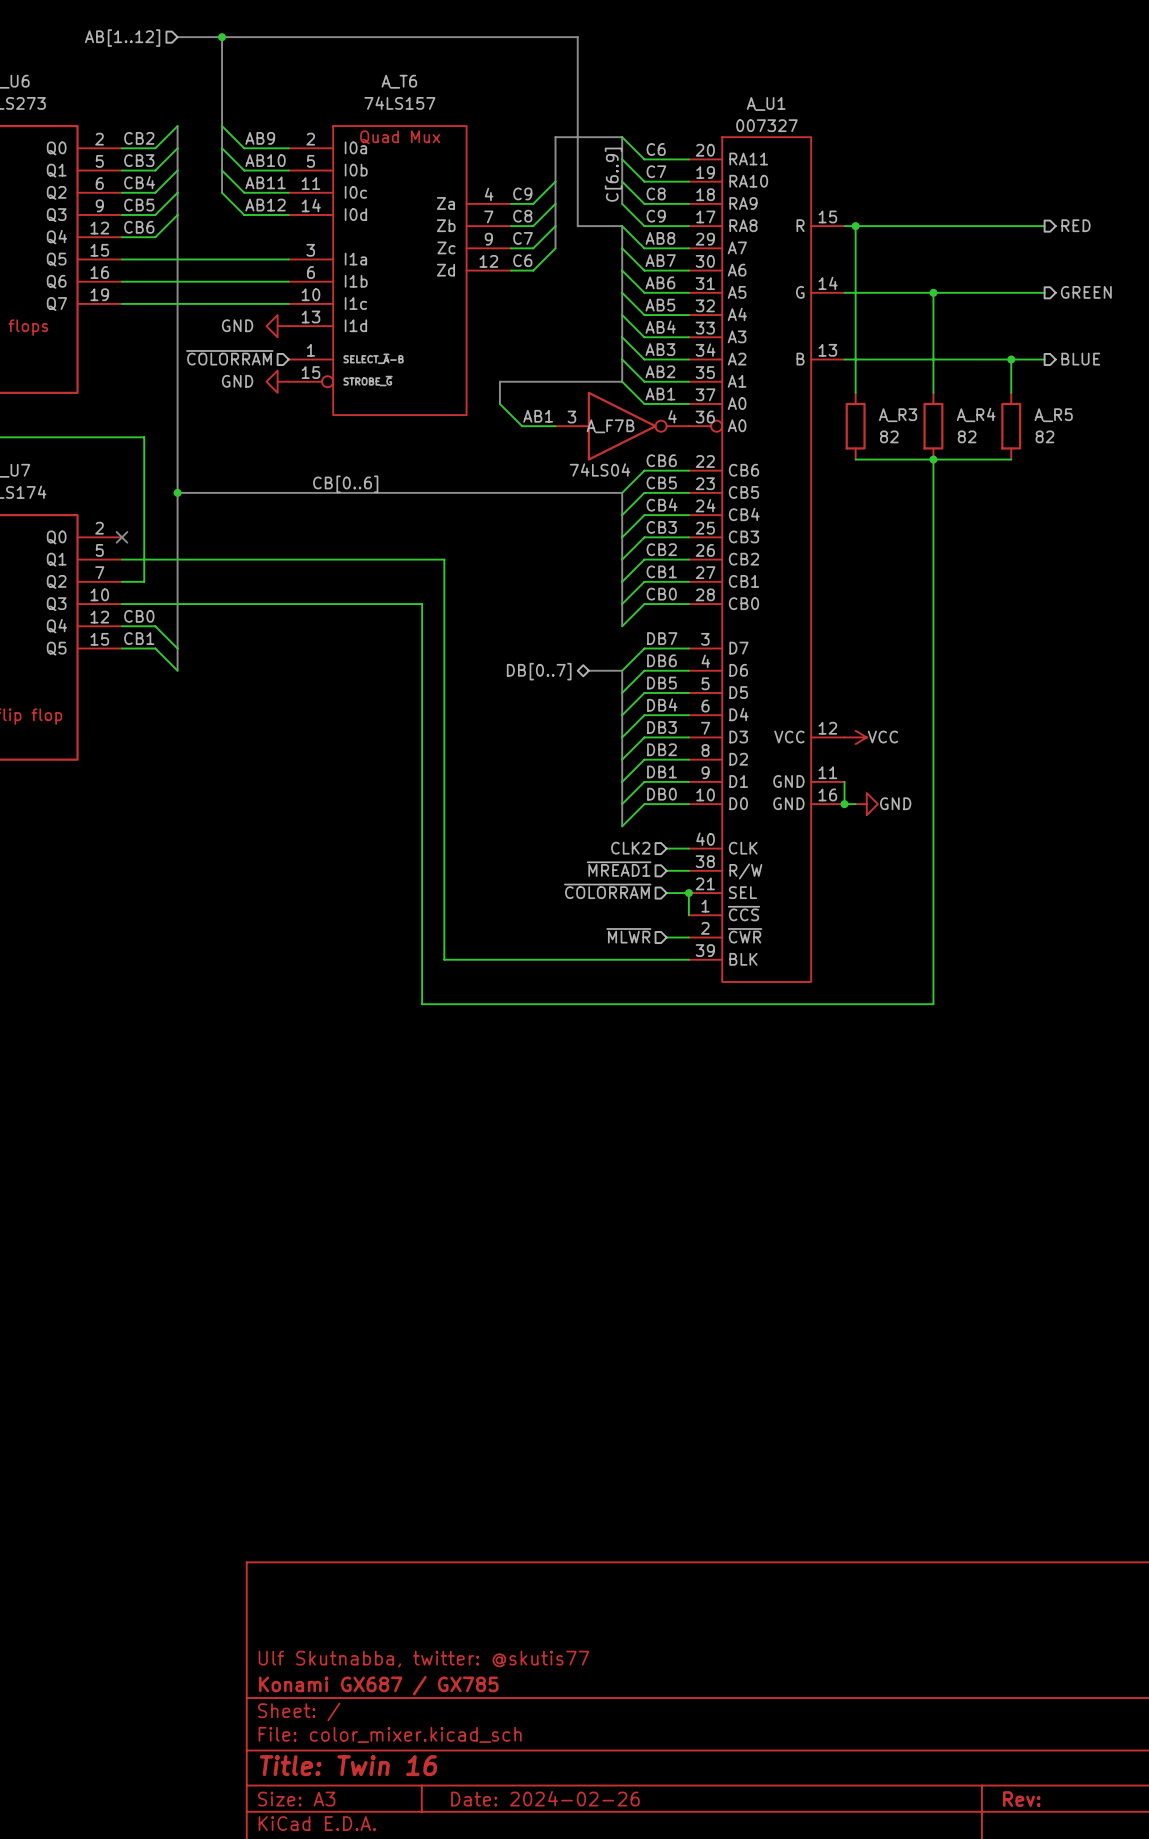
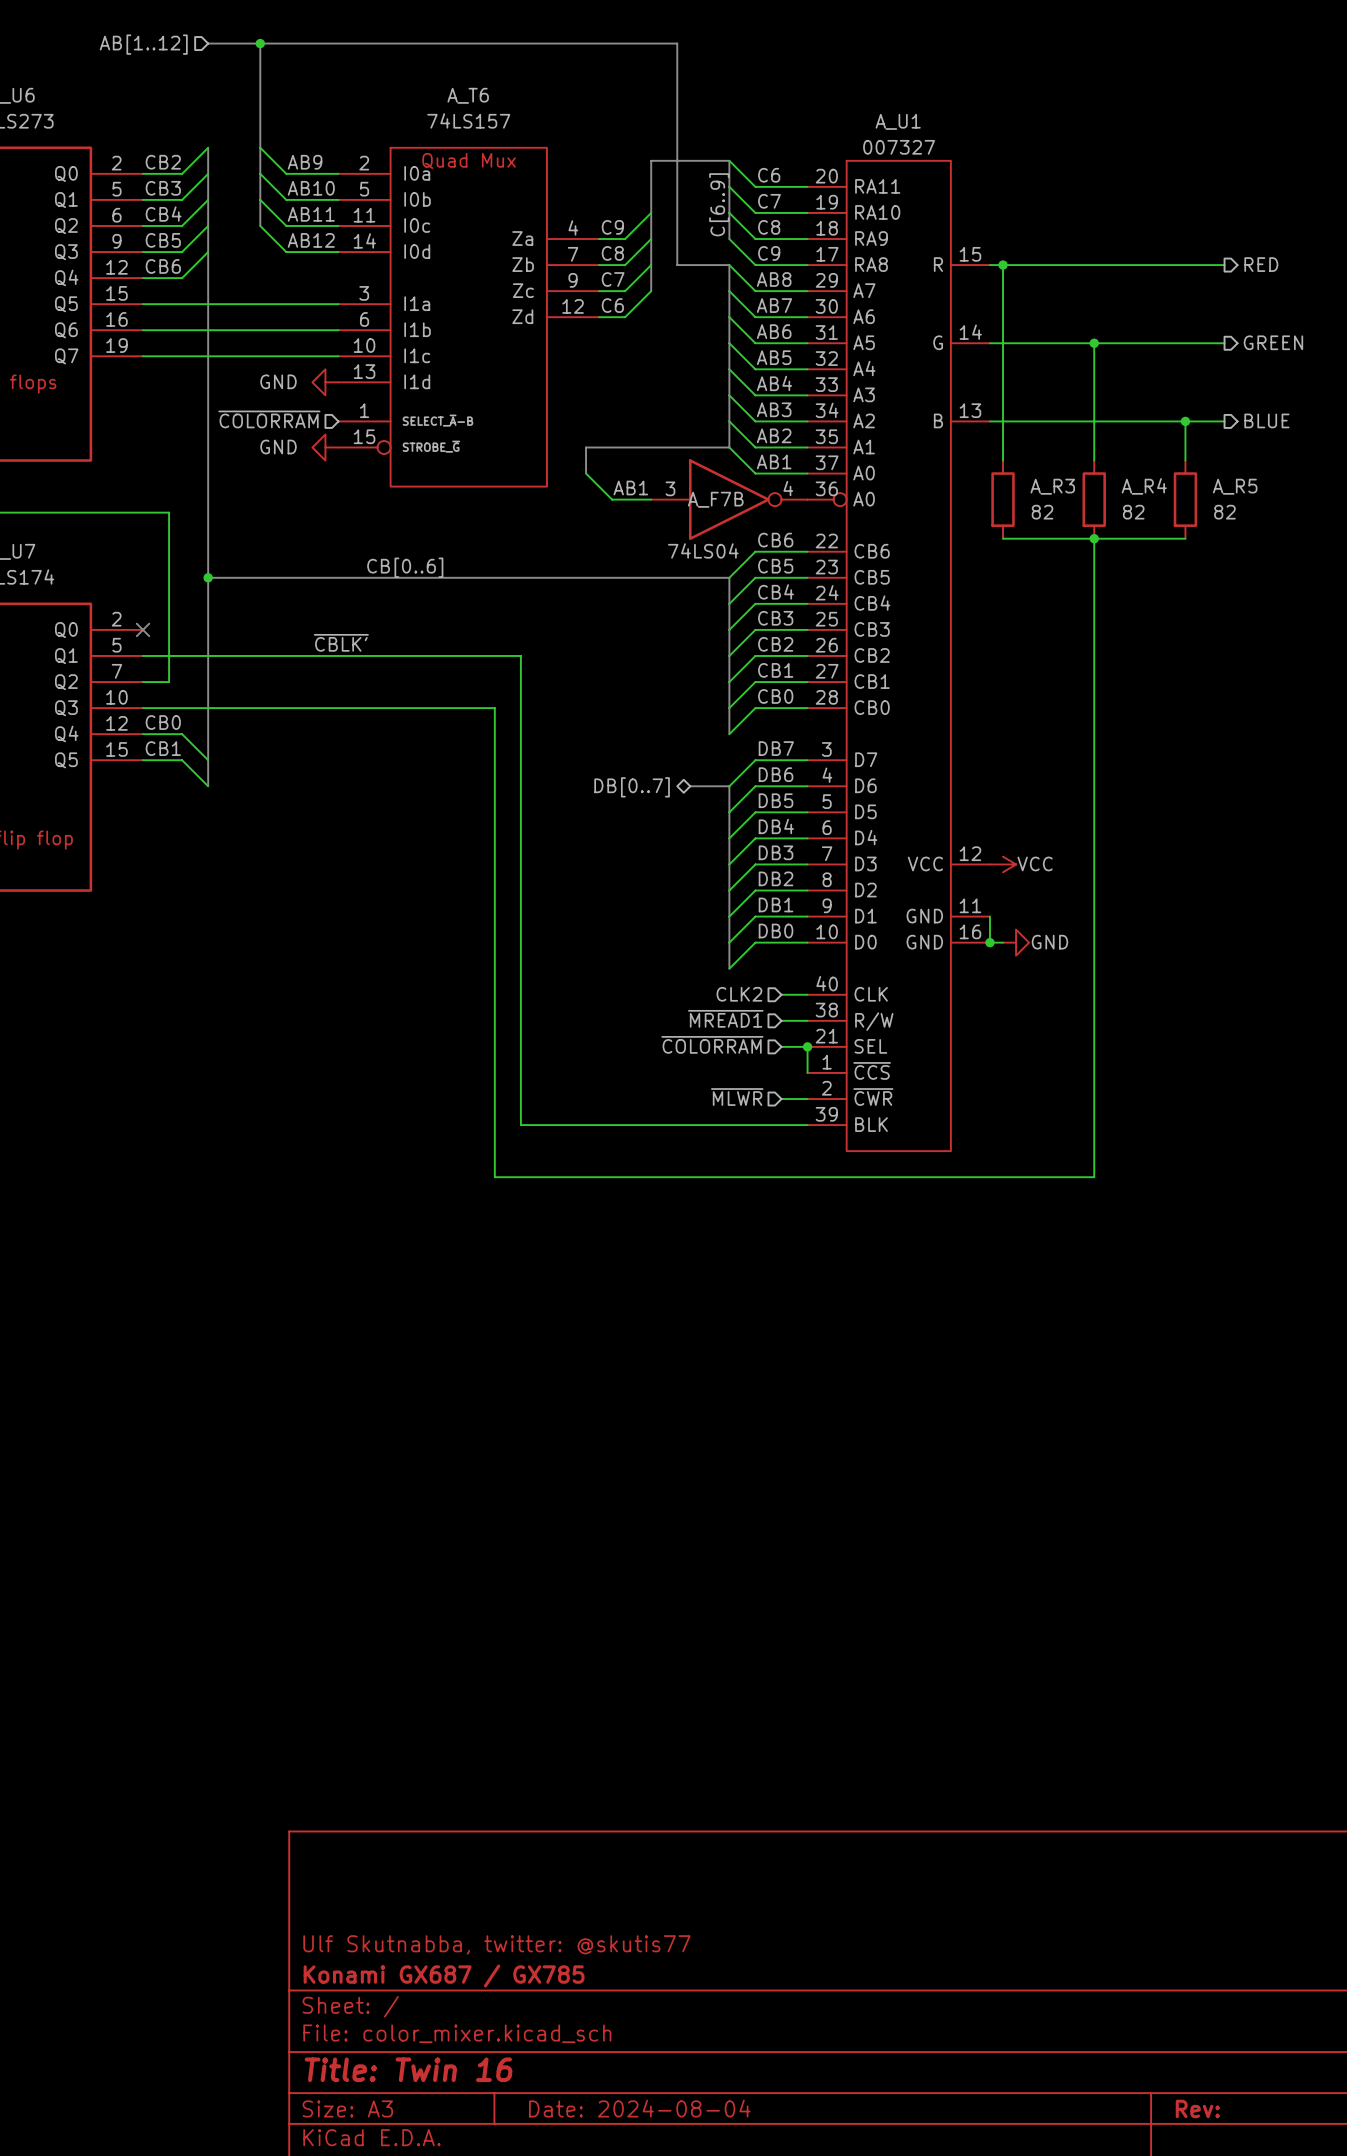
label: none -> ~{CBLK'} (341, 642)
title block: Date: 2024-02-26 (545, 1798) -> Date: 2024-08-04 (639, 2108)

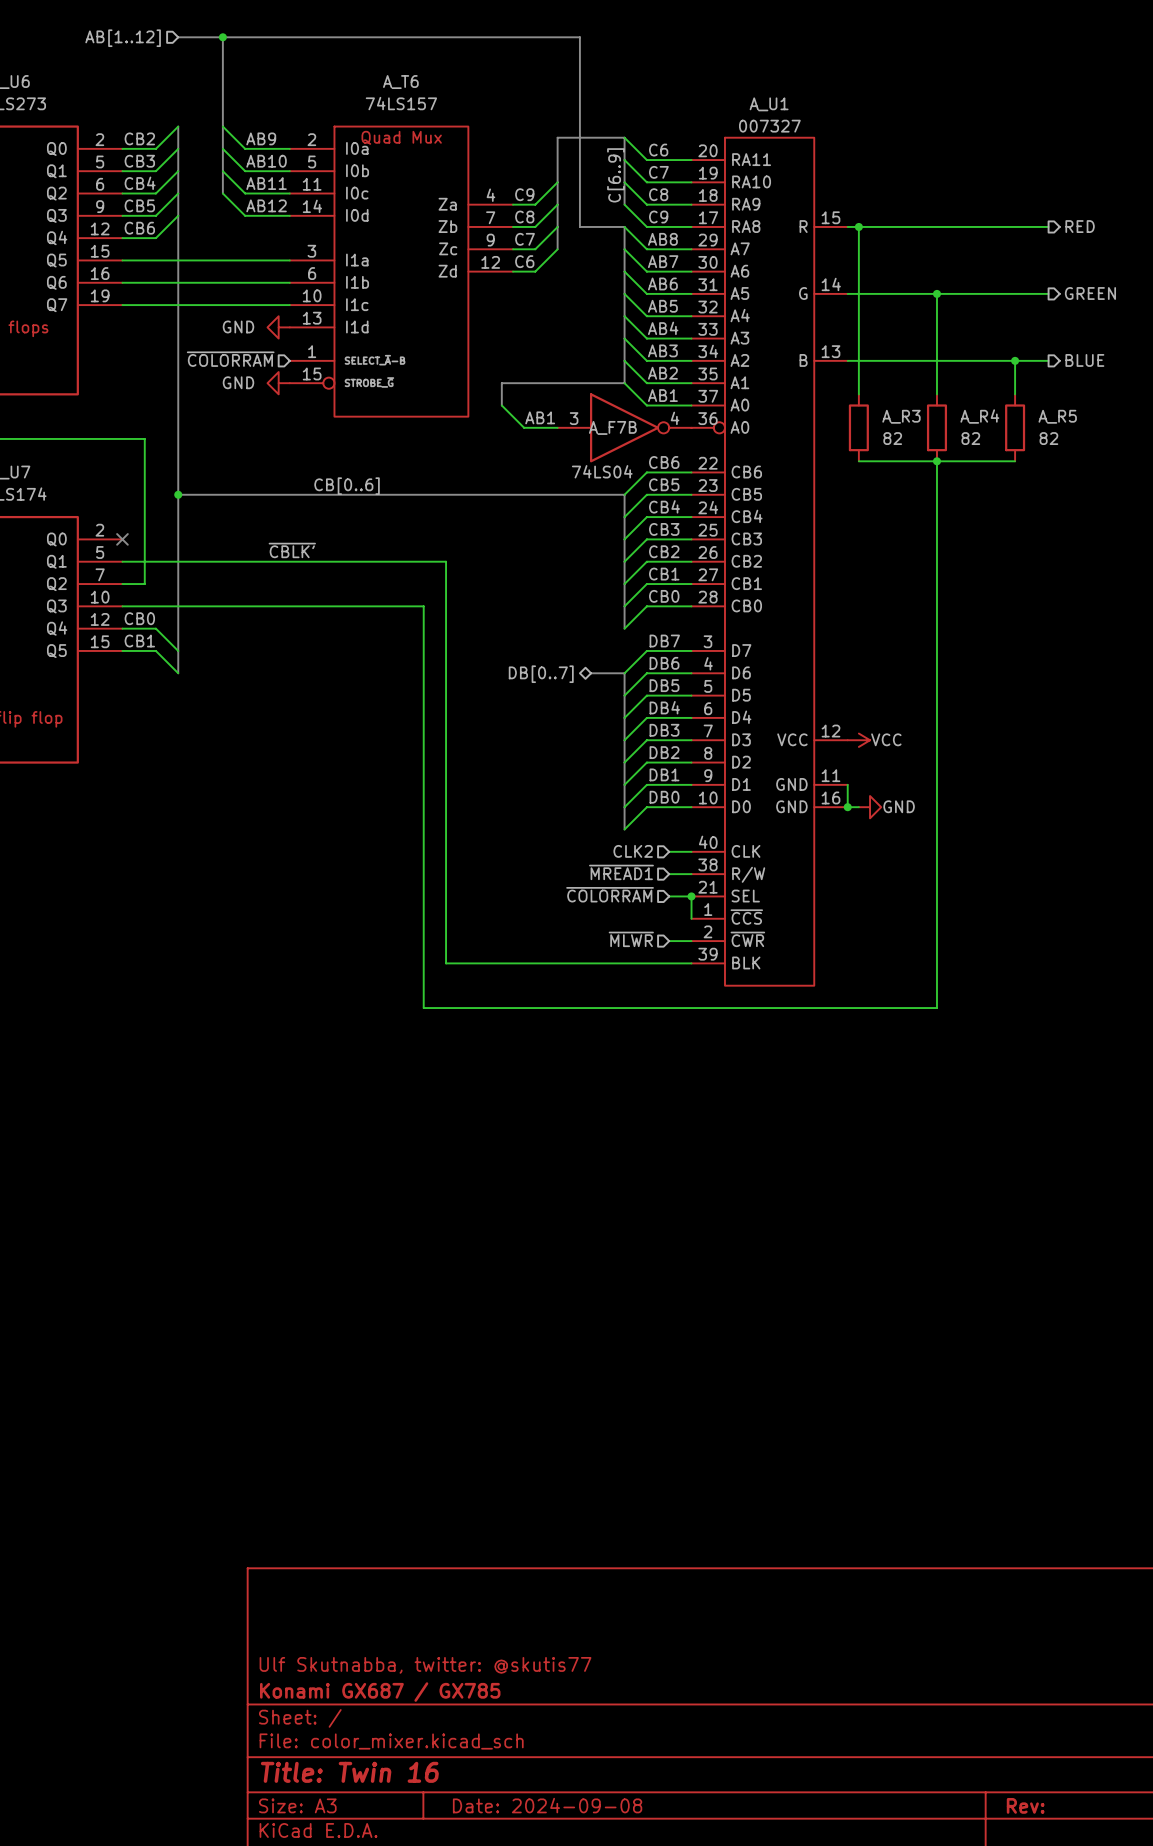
title block: Date: 2024-08-04 (639, 2108) -> Date: 2024-09-08 (547, 1805)

